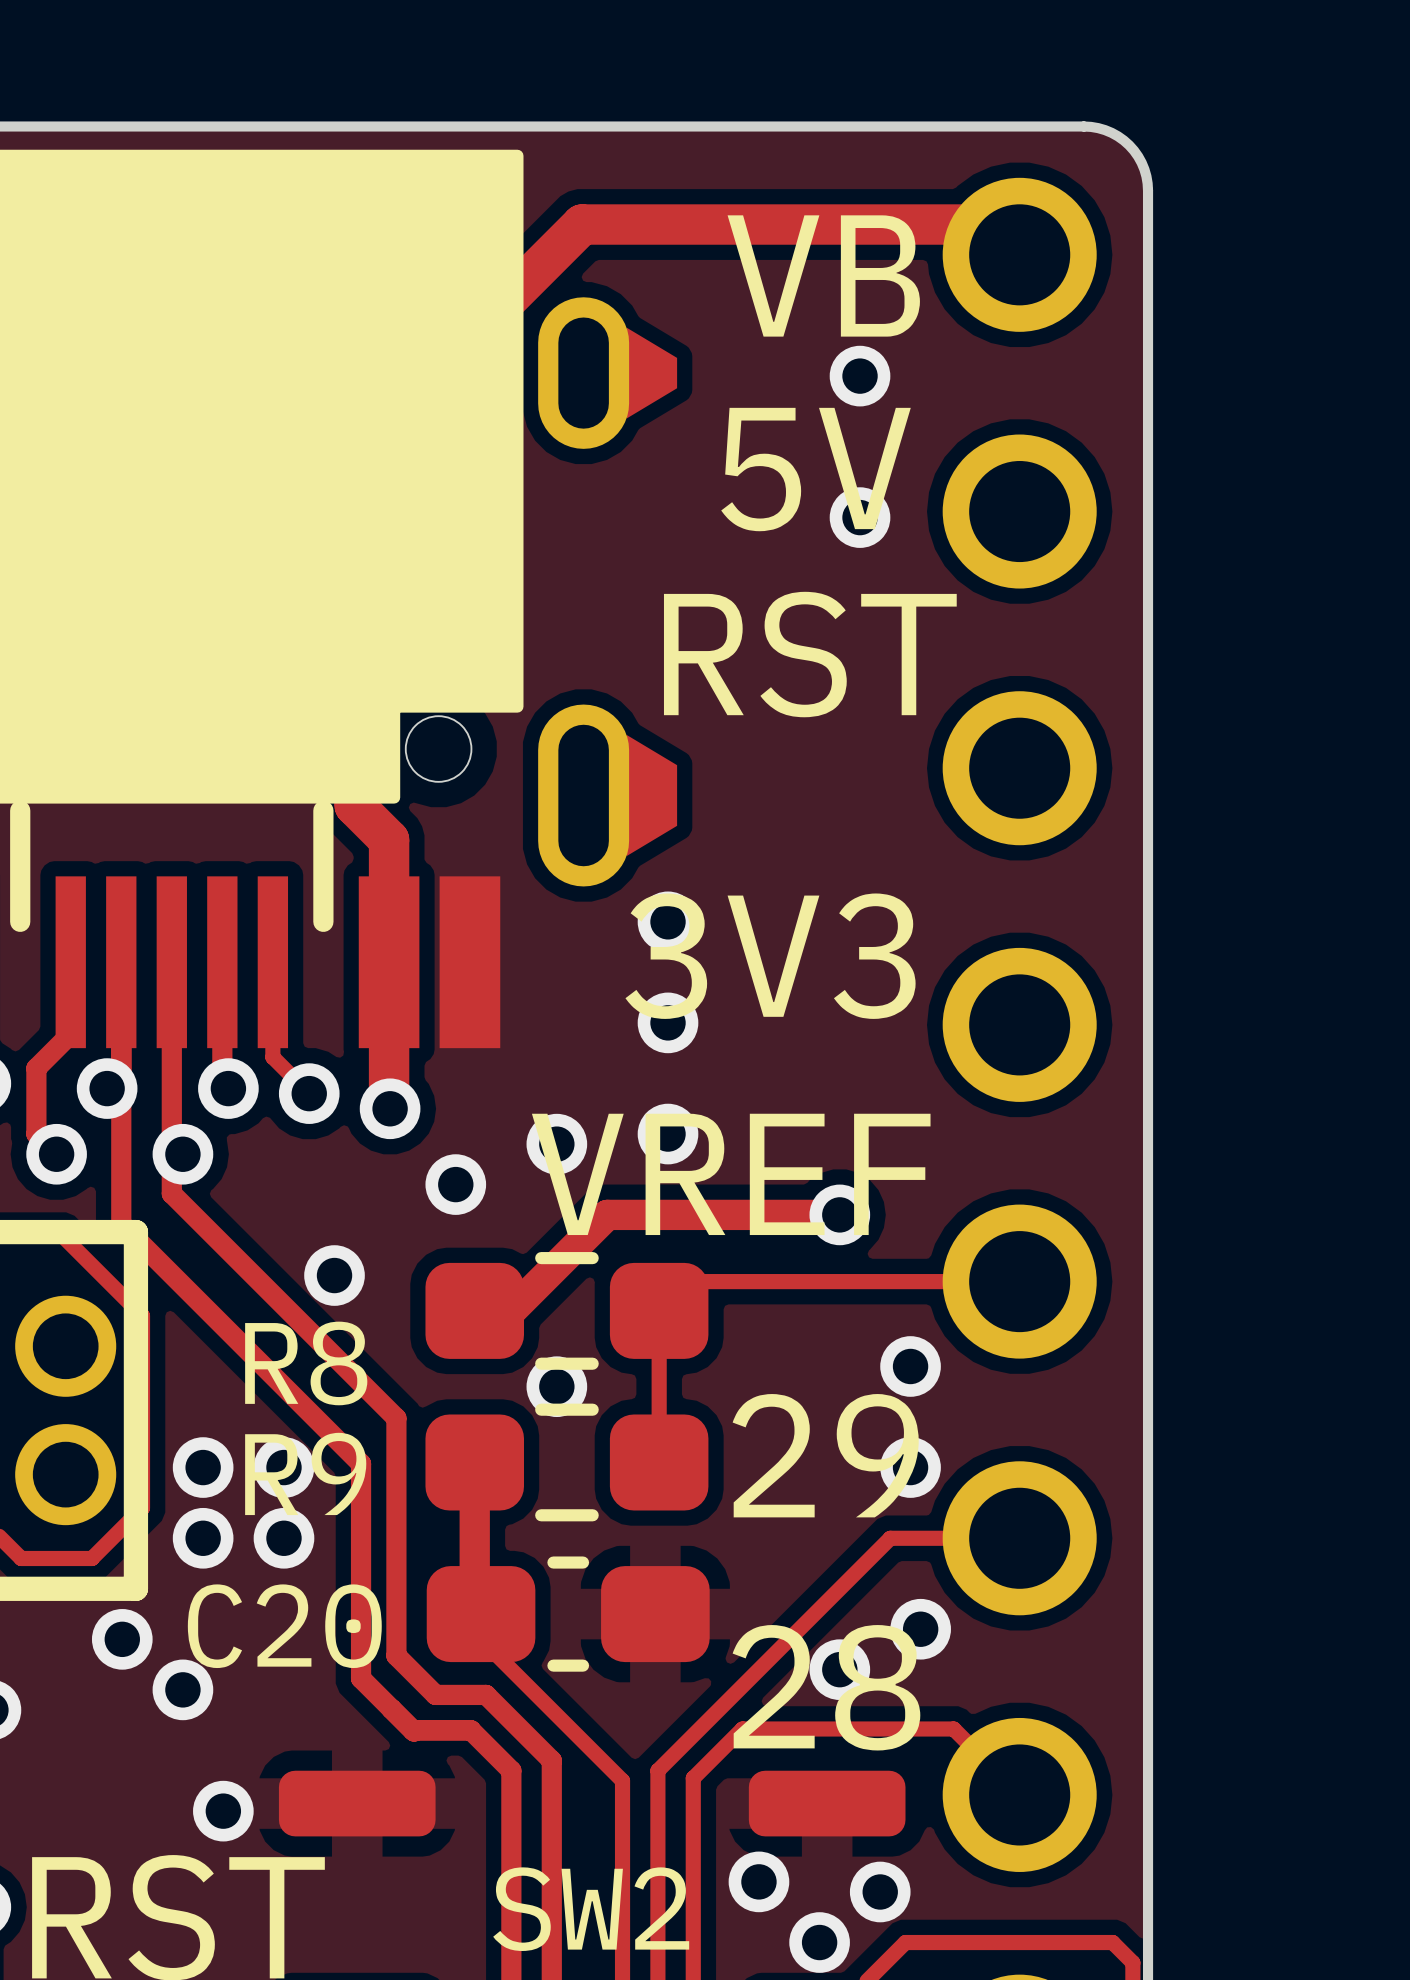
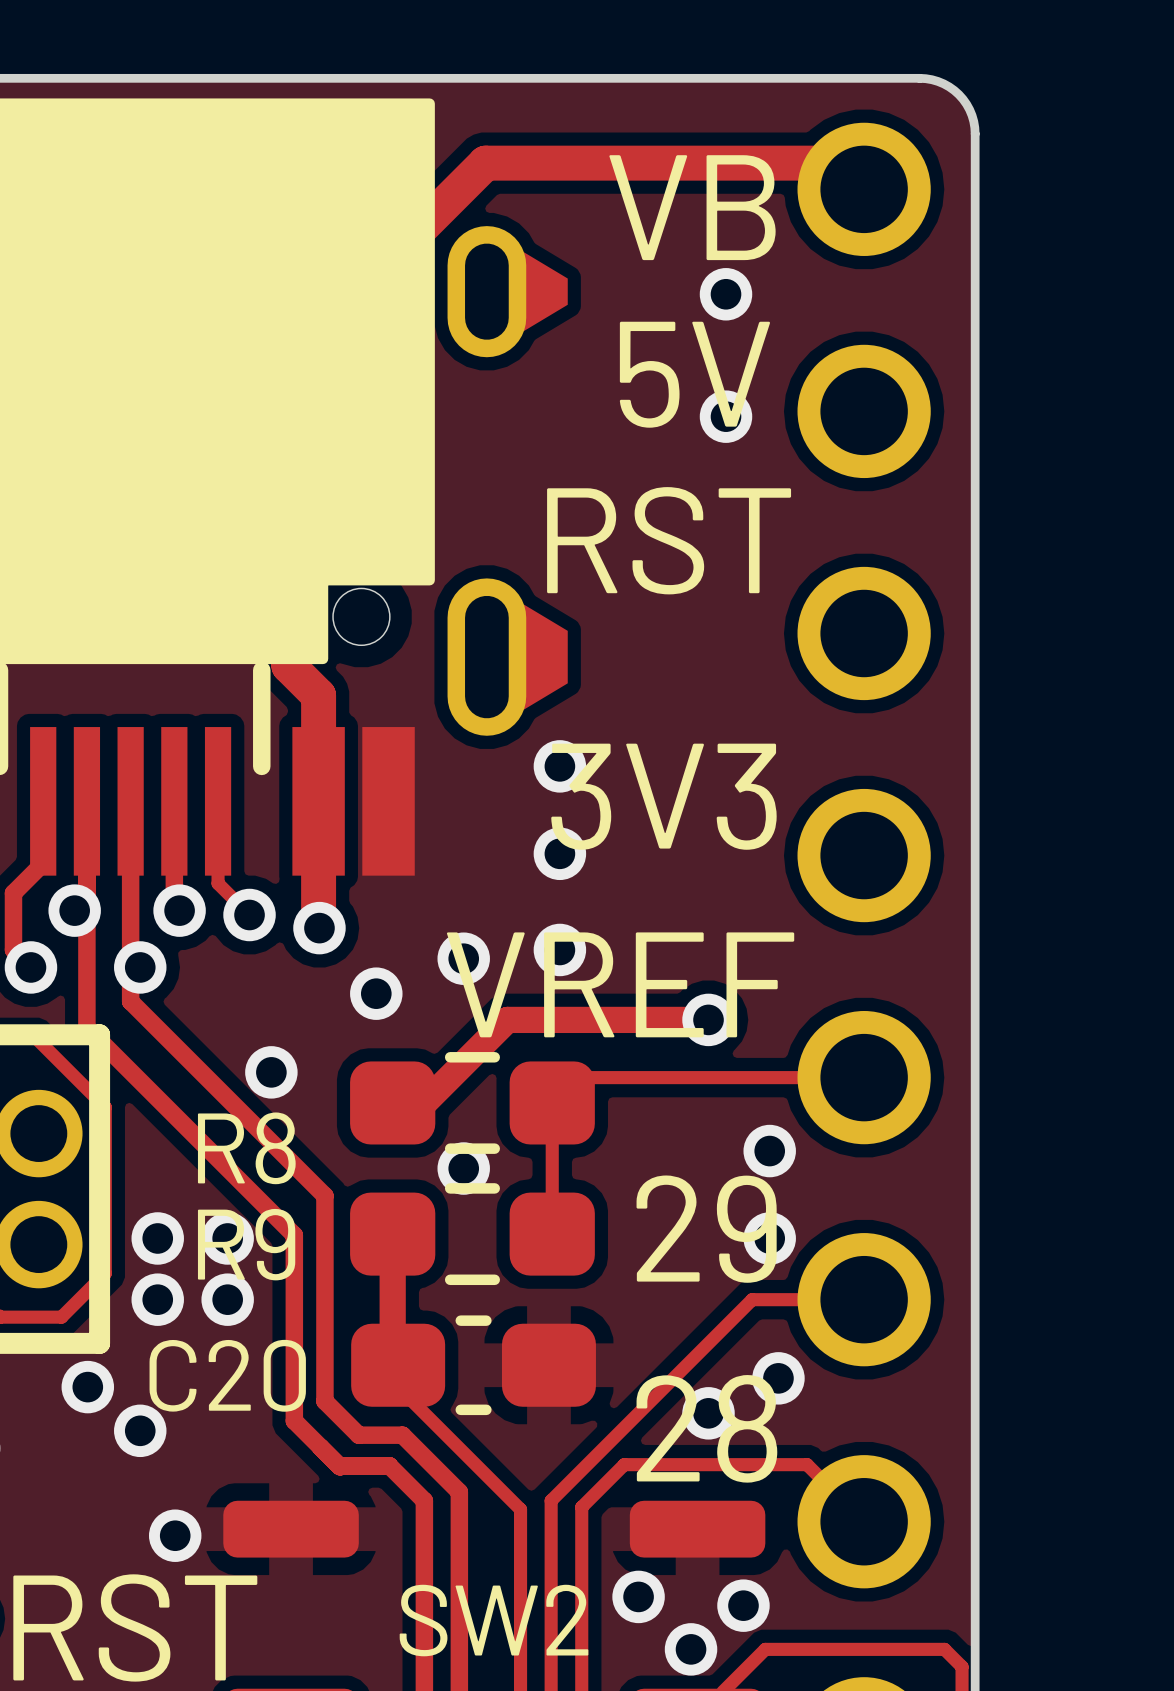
text position: RST (810, 654) -> RST (669, 540)

